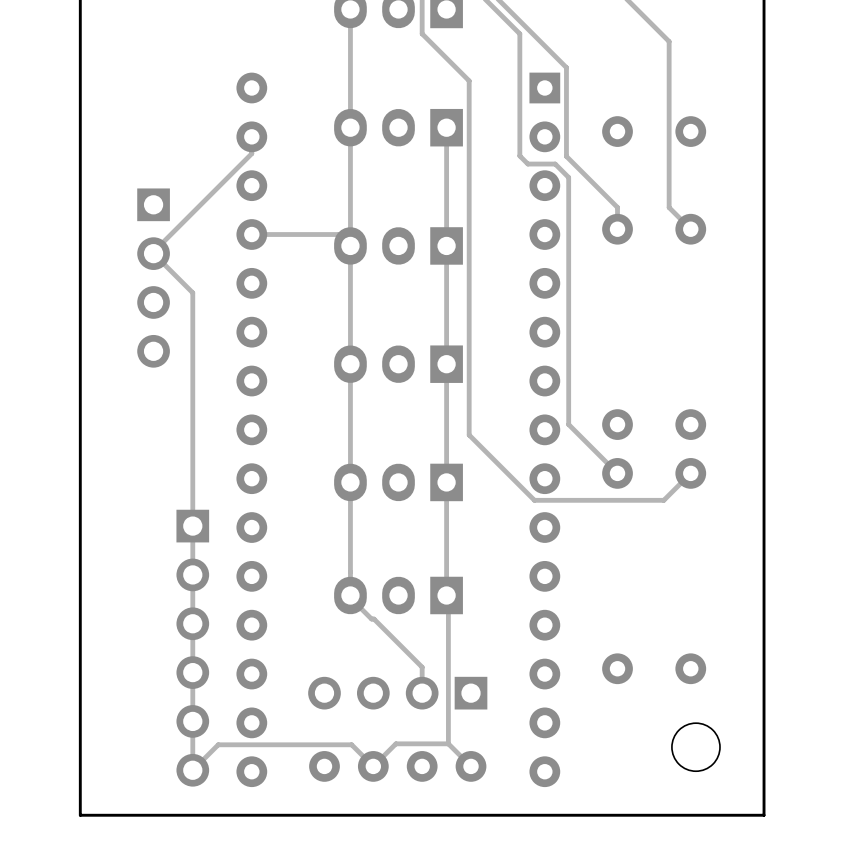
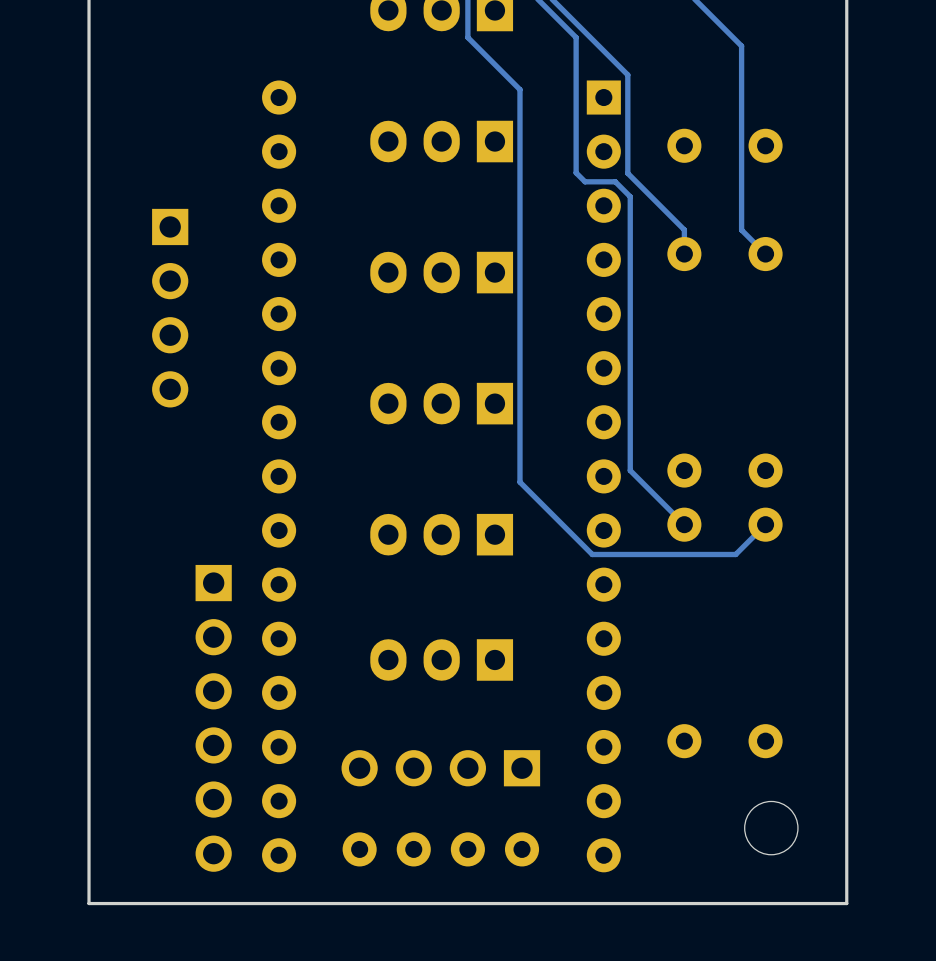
track: (350, 9) (350, 597) (422, 667) (422, 693) -> none
track: (446, 127) (448, 743) -> none
track: (251, 136) (251, 153) (153, 251) (192, 292) (192, 770) (218, 744) (351, 744) (373, 766) (395, 743) (448, 743) -> none
track: (251, 234) (339, 234) (350, 245) -> none
track: (448, 743) (471, 766) -> none

